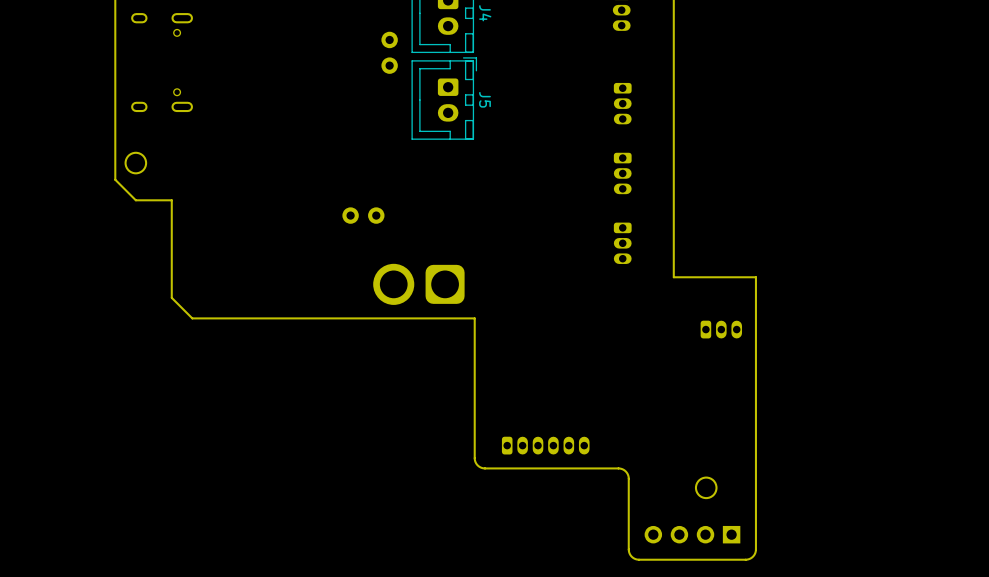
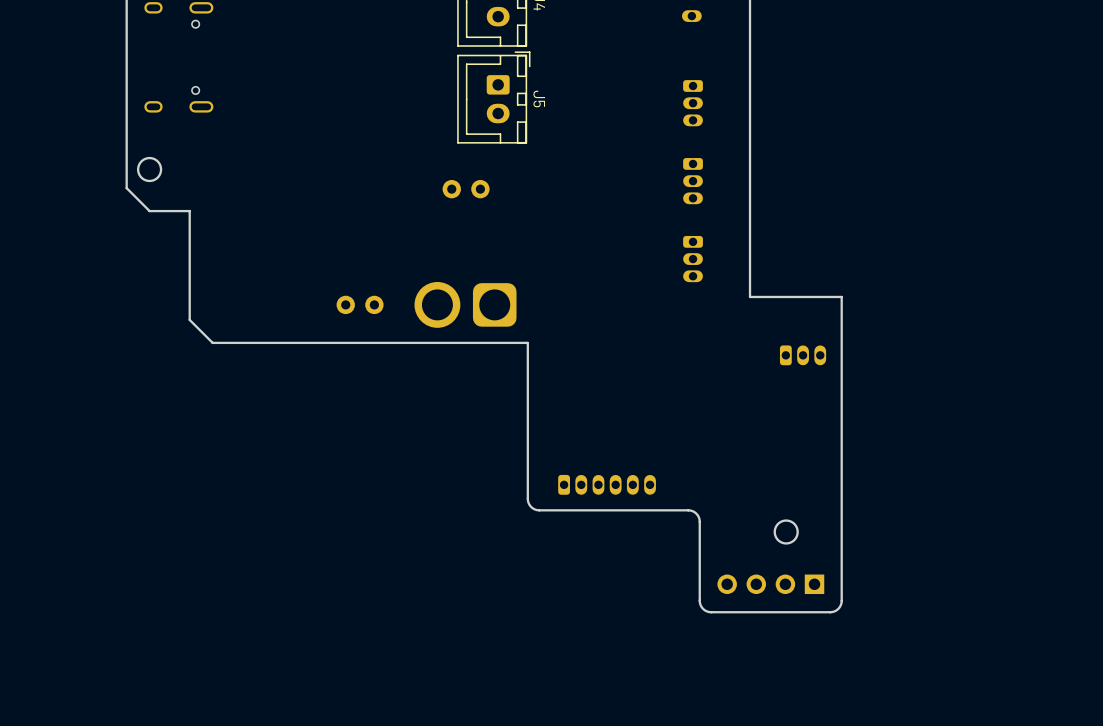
part: (389, 52) -> none
part: none -> (466, 189)
part: (363, 215) -> none
part: none -> (360, 304)

